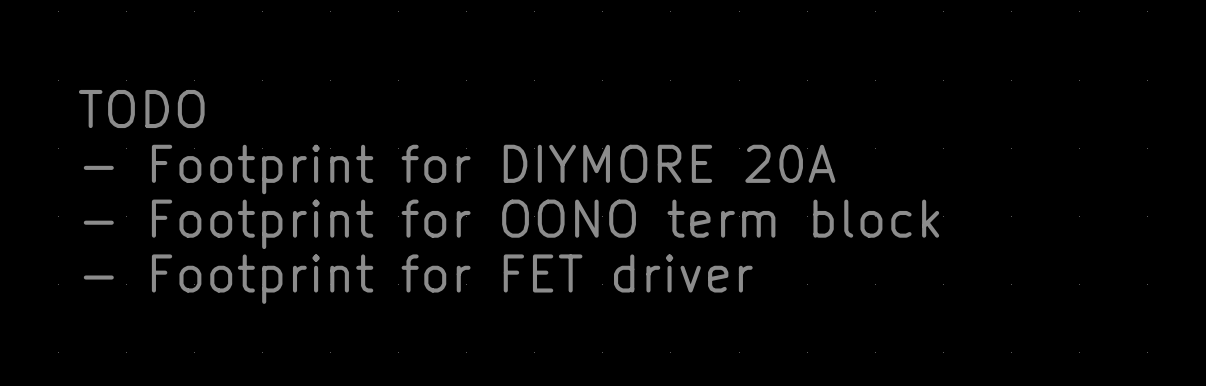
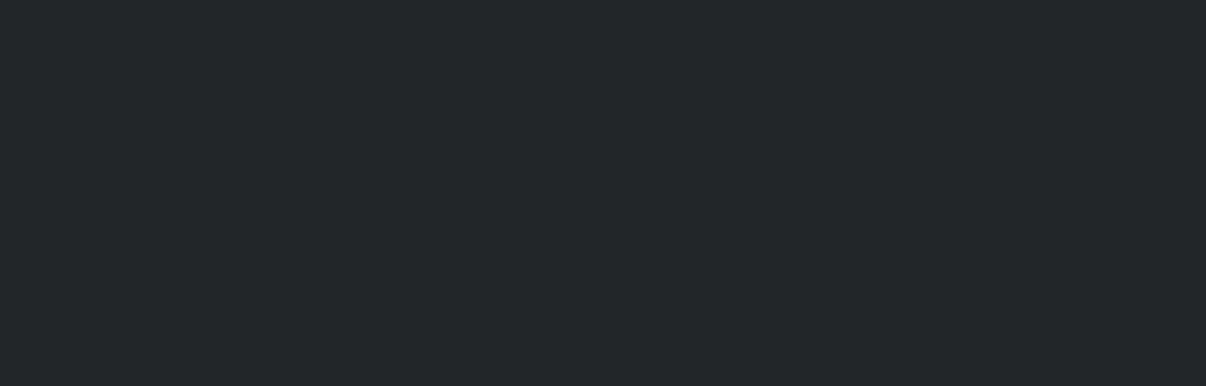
text: TODO (141, 109) -> none
text: - Footprint for DIYMORE 20A (459, 169) -> none
text: - Footprint for OONO term block (511, 224) -> none
text: - Footprint for FET driver (418, 279) -> none

